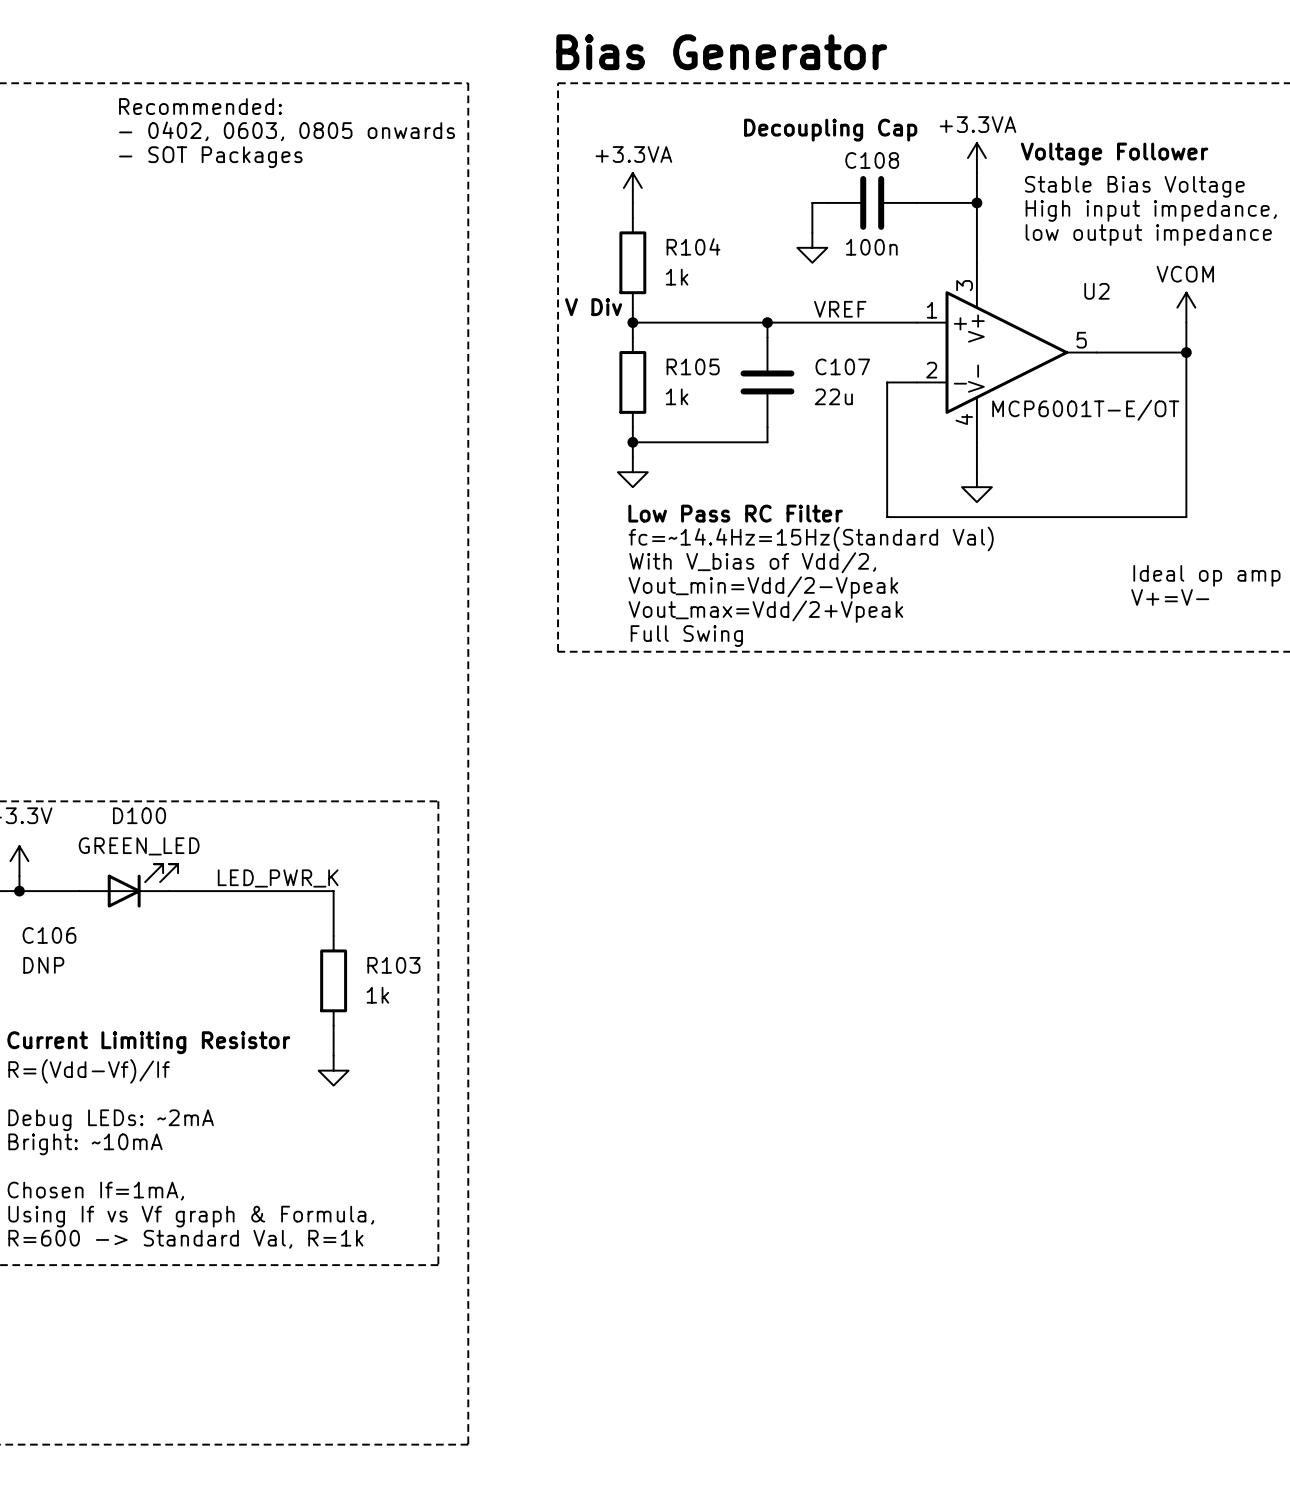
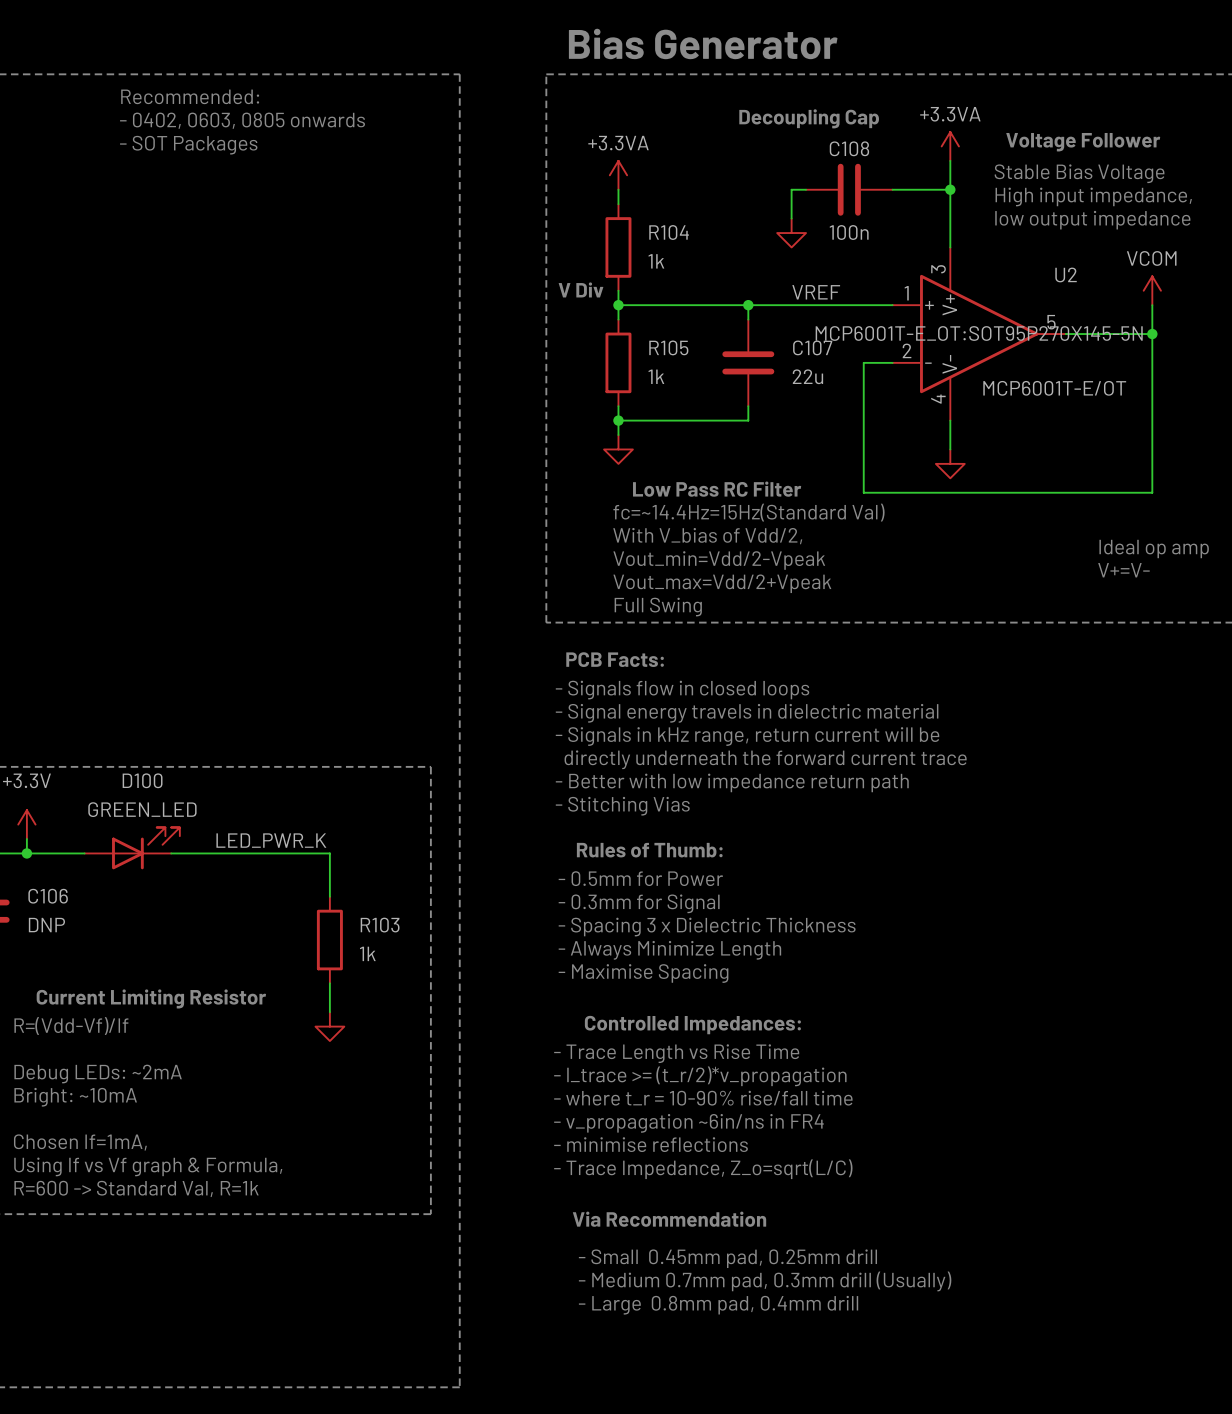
U2 text: none -> MCP6001T-E_OT:SOT95P270X145-5N (979, 333)
text: none -> PCB Facts: (615, 659)
text: none -> - Signals flow in closed loops (682, 690)
text: none -> - Signal energy travels in dielectric material (747, 713)
text: none -> - Signals in kHz range, return current will be (747, 736)
text: none -> directly underneath the forward current trace (765, 759)
text: none -> - Better with low impedance return path (732, 782)
text: none -> - Stitching Vias (622, 806)
text: none -> Rules of Thumb: (649, 850)
text: none -> - 0.5mm for Power (640, 878)
text: none -> - 0.3mm for Signal (639, 903)
text: none -> - Spacing 3 x Dielectric Thickness (707, 927)
text: none -> - Always Minimize Length (669, 950)
text: none -> - Maximise Spacing (643, 973)
text: none -> Controlled Impedances: (692, 1025)
text: none -> - Trace Length vs Rise Time (676, 1053)
text: none -> - l_trace >= (t_r/2)*v_propagation (700, 1076)
text: none -> - where t_r = 10-90% rise/fall time (703, 1098)
text: none -> - v_propagation ~6in/ns in FR4 (688, 1123)
text: none -> - minimise reflections (650, 1144)
text: none -> - Trace Impedance, Z_o=sqrt(L/C) (703, 1169)
text: none -> Via Recommendation (669, 1219)
text: none -> - Small 0.45mm pad, 0.25mm drill (727, 1258)
text: none -> - Medium 0.7mm pad, 0.3mm drill (Usually) (765, 1281)
text: none -> - Large 0.8mm pad, 0.4mm drill (718, 1305)

